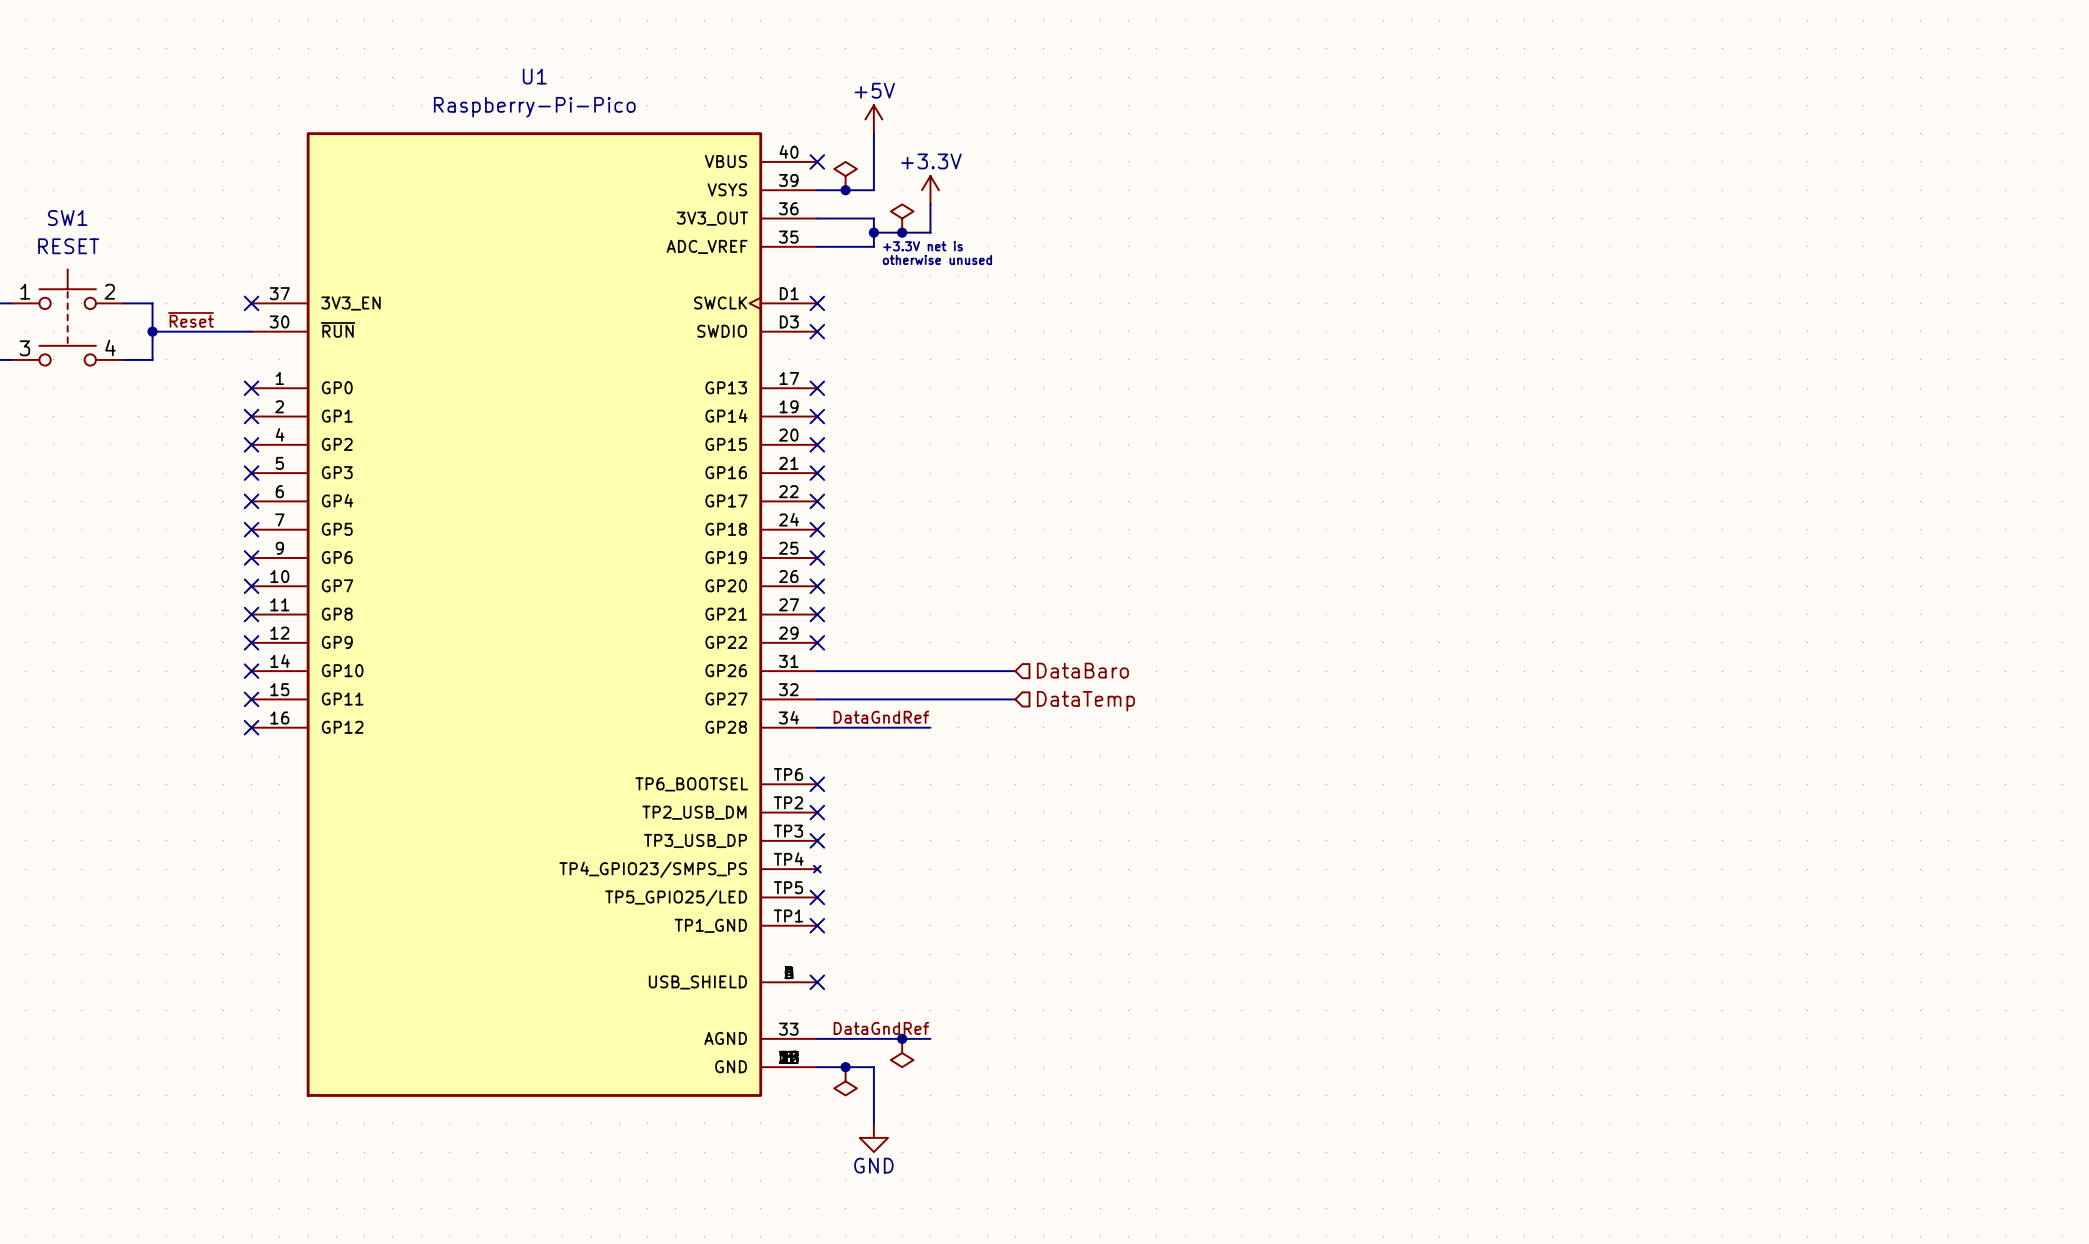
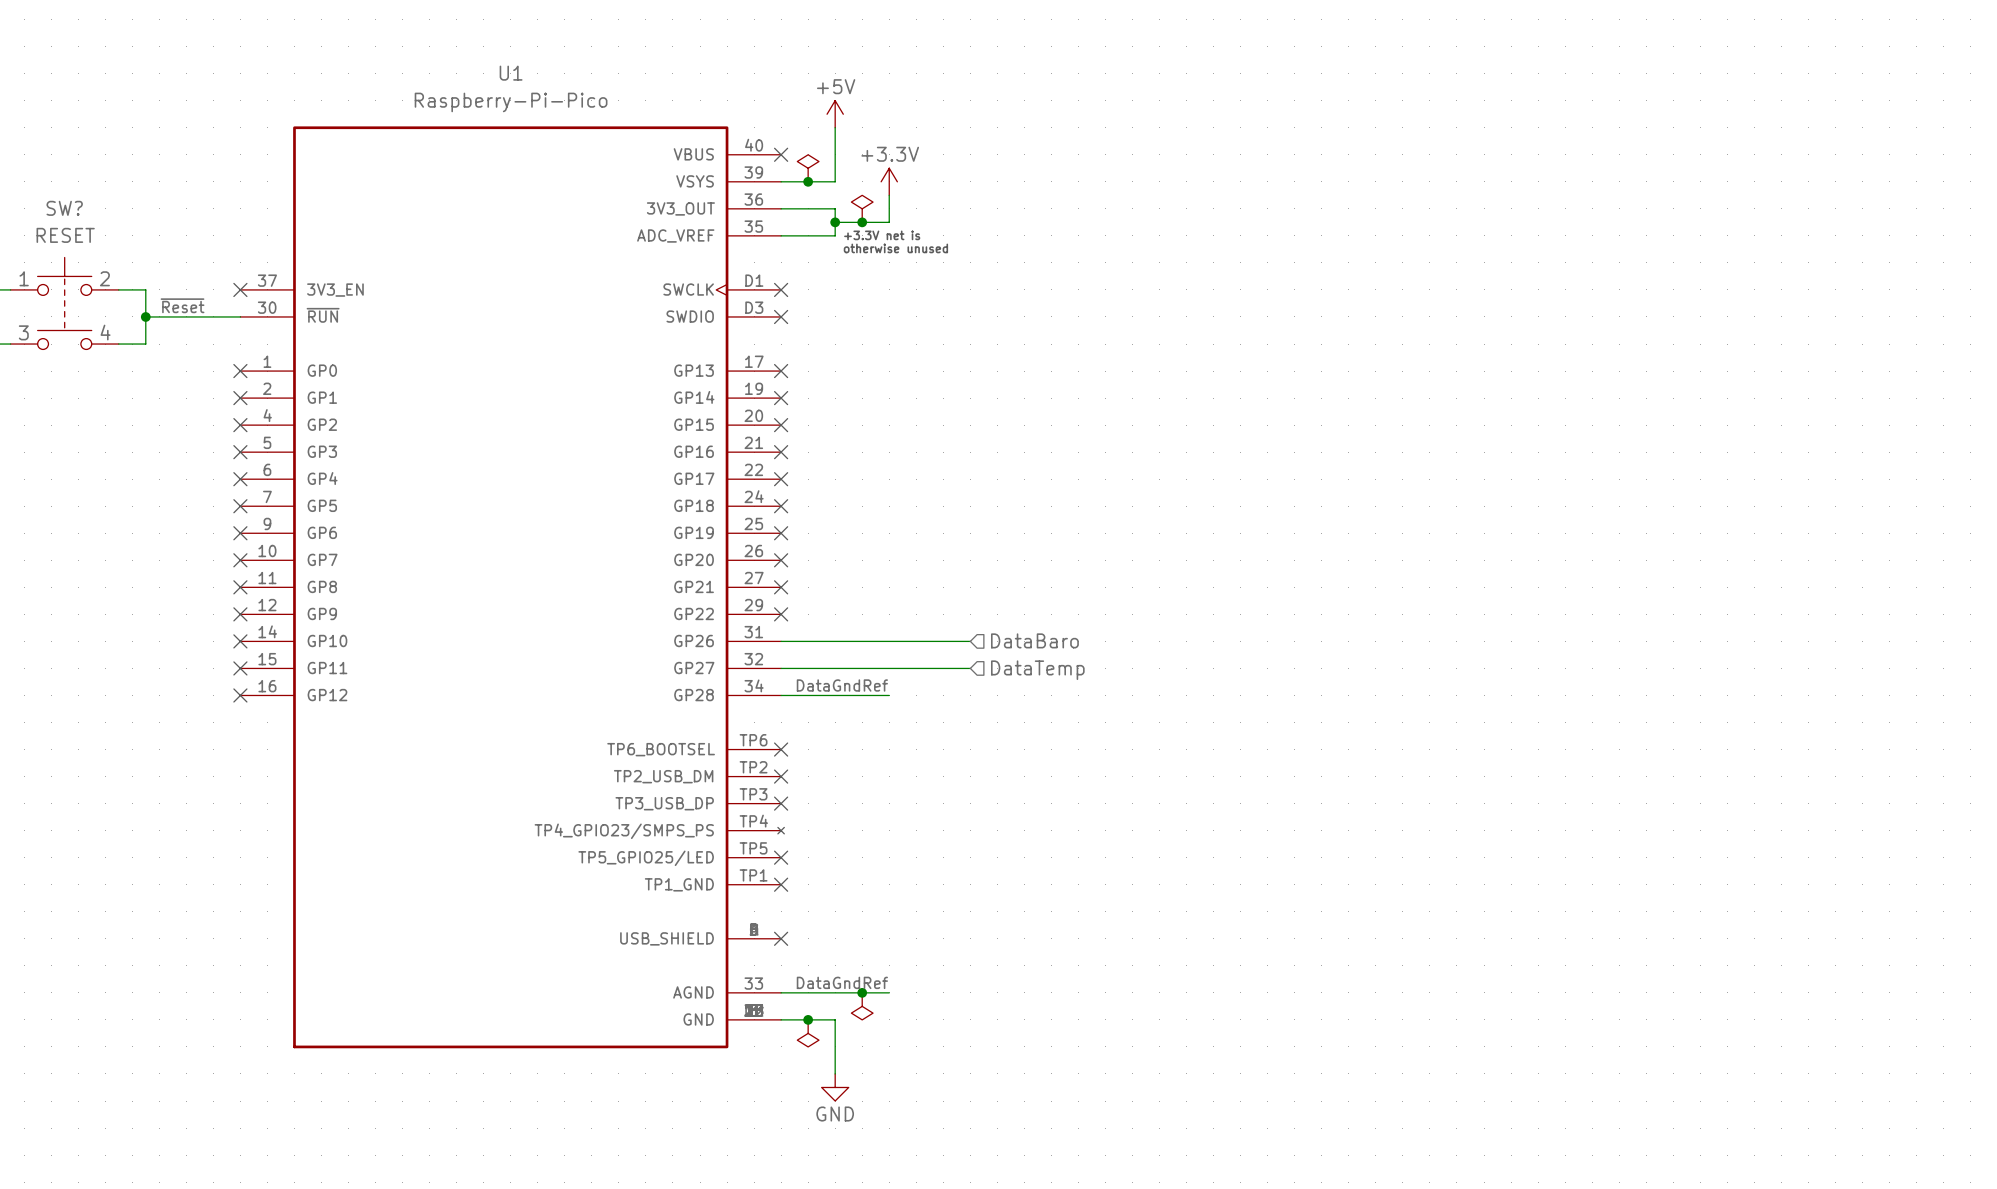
SW1 name: SW1 (67, 217) -> SW? (64, 208)

